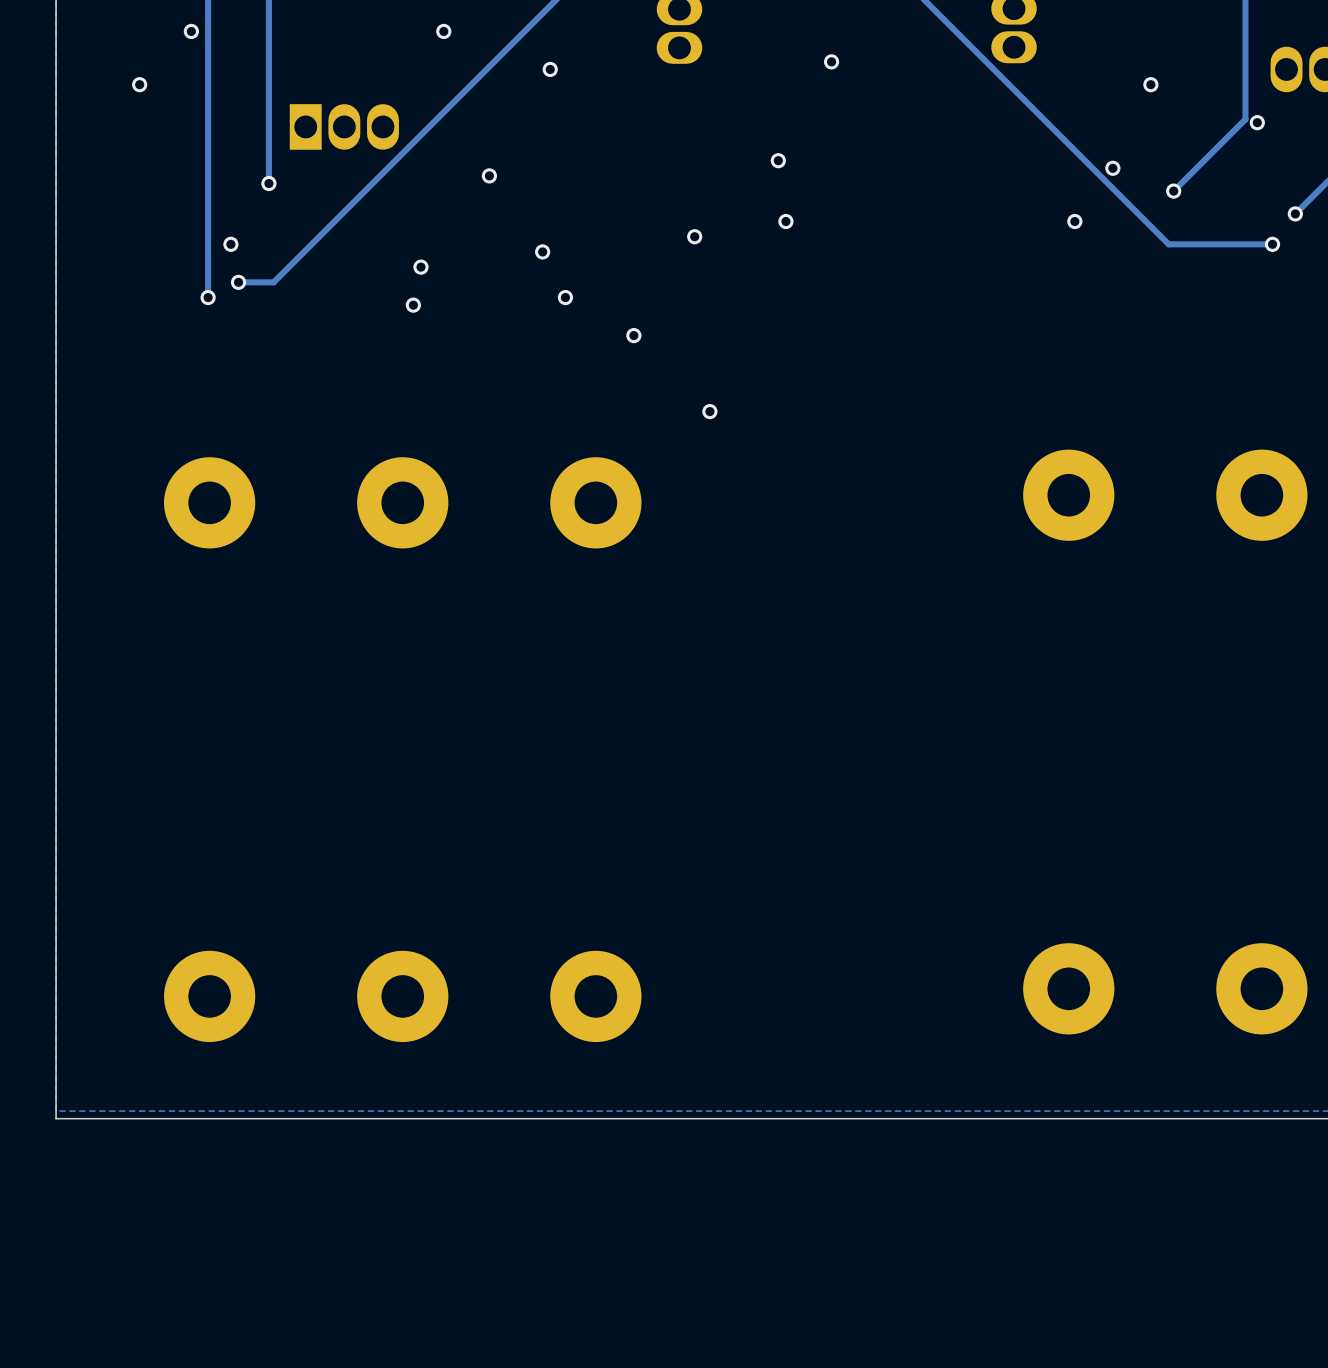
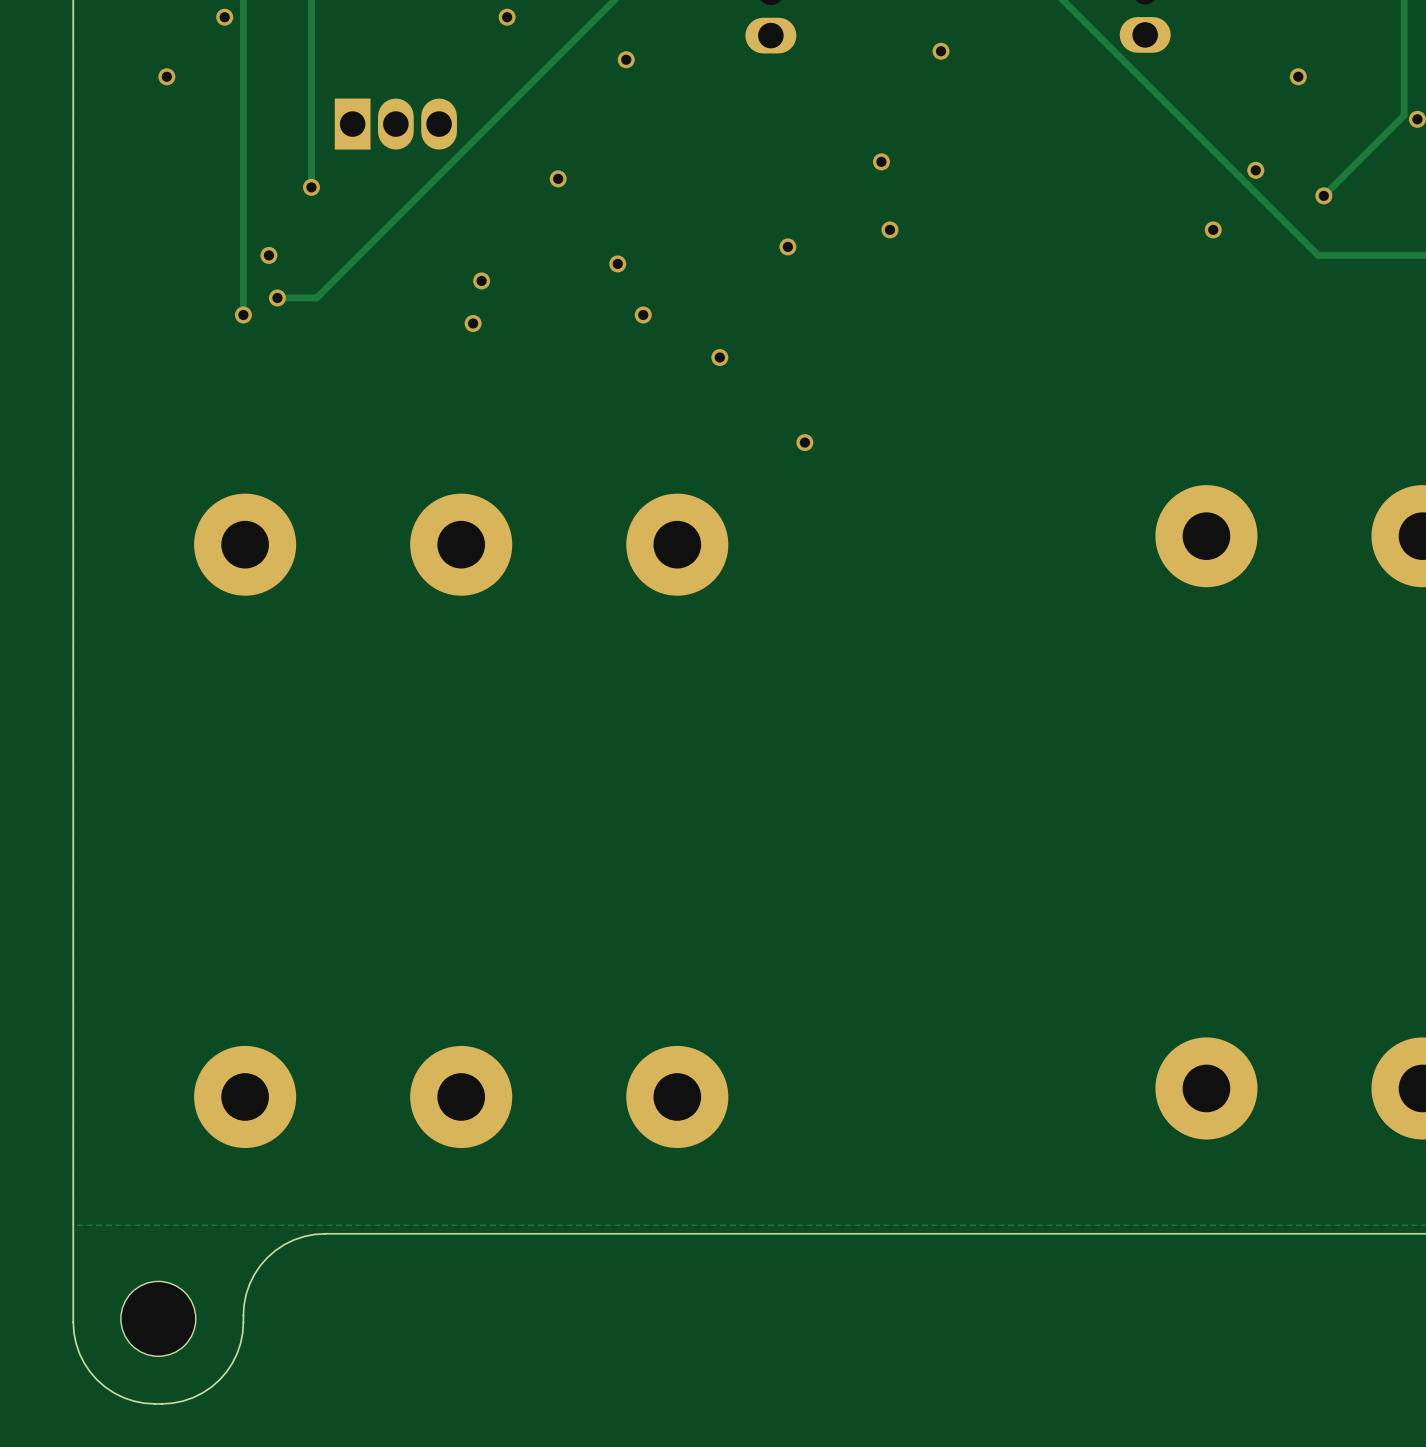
board edge: (281, 1118) (56, 1118) -> (325, 1233) (303, 1236) (284, 1244) (260, 1265) (246, 1294) (242, 1332) (237, 1353) (219, 1380) (193, 1397) (161, 1403) (133, 1401) (114, 1392) (97, 1380) (84, 1363) (73, 1332) (73, 1233)
part: none -> (158, 1318)

